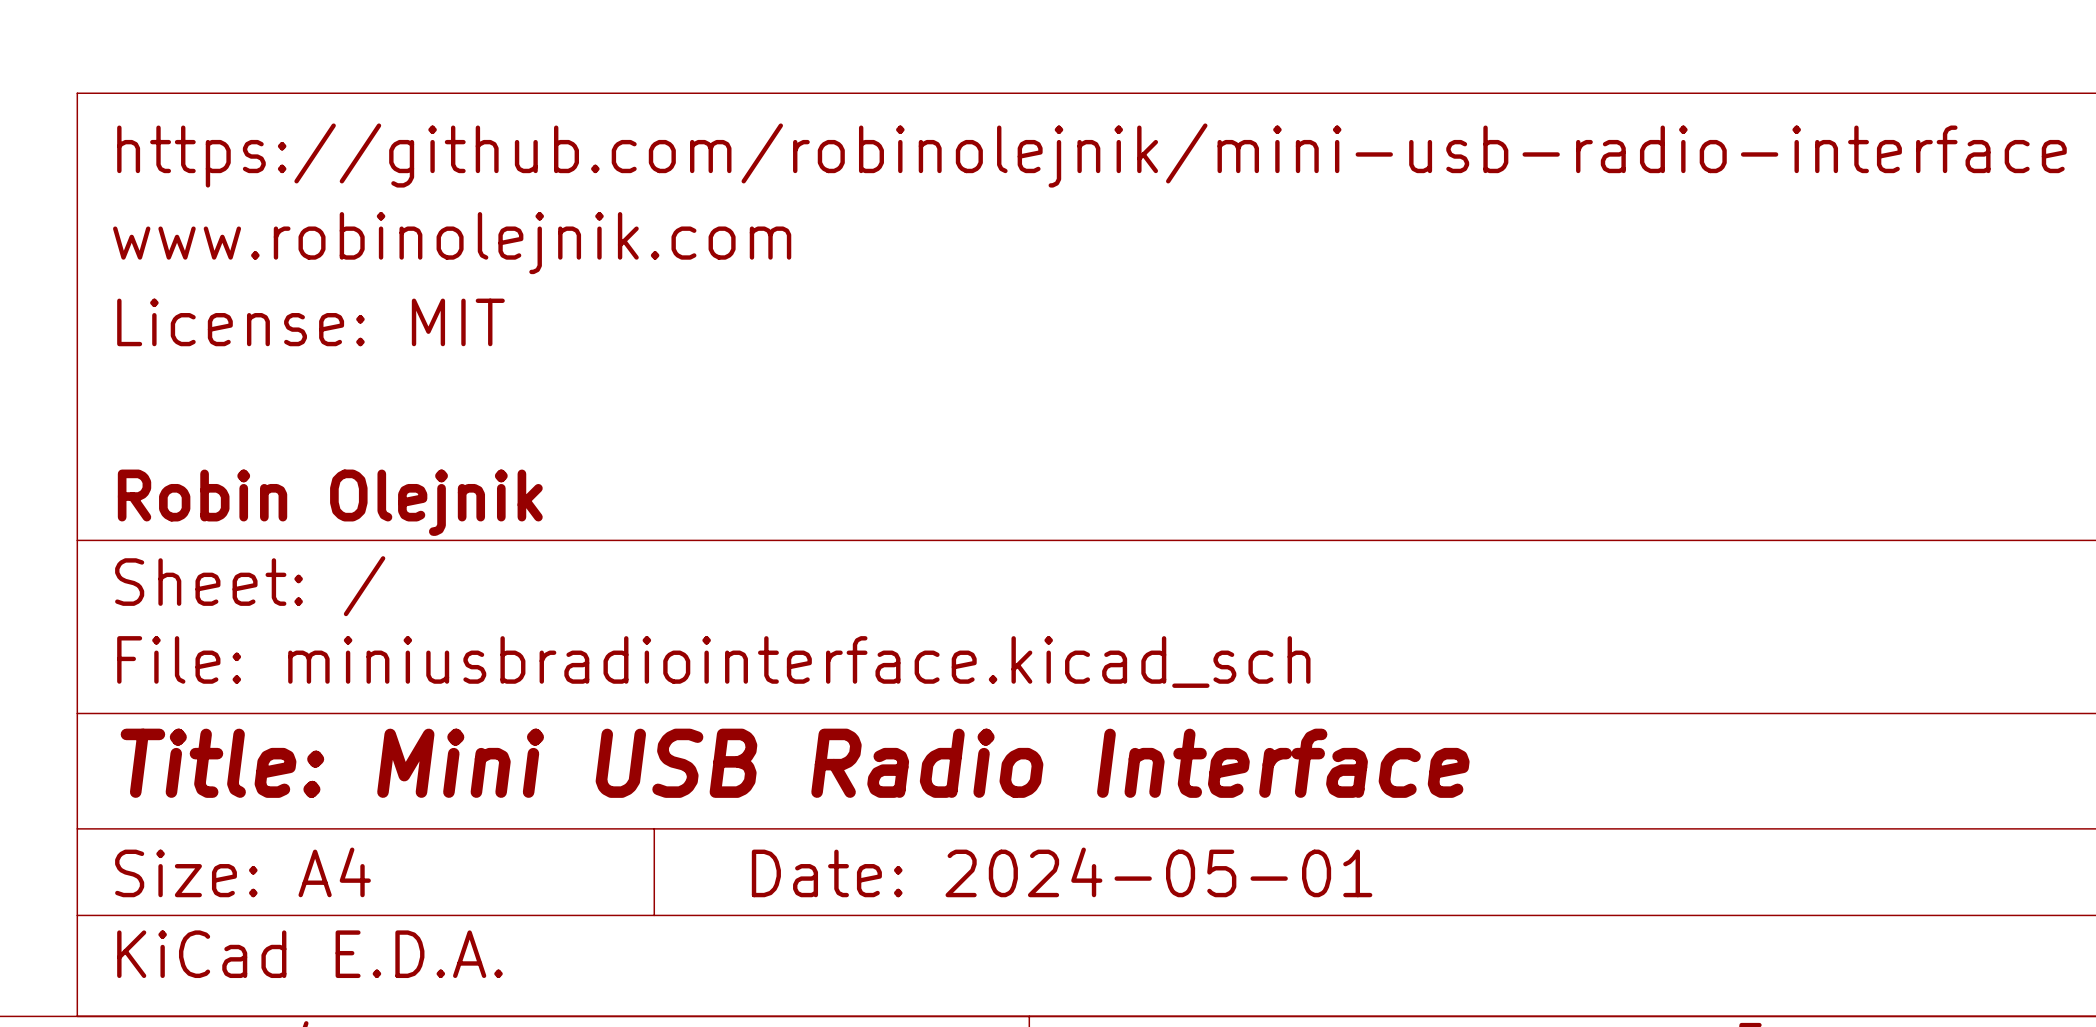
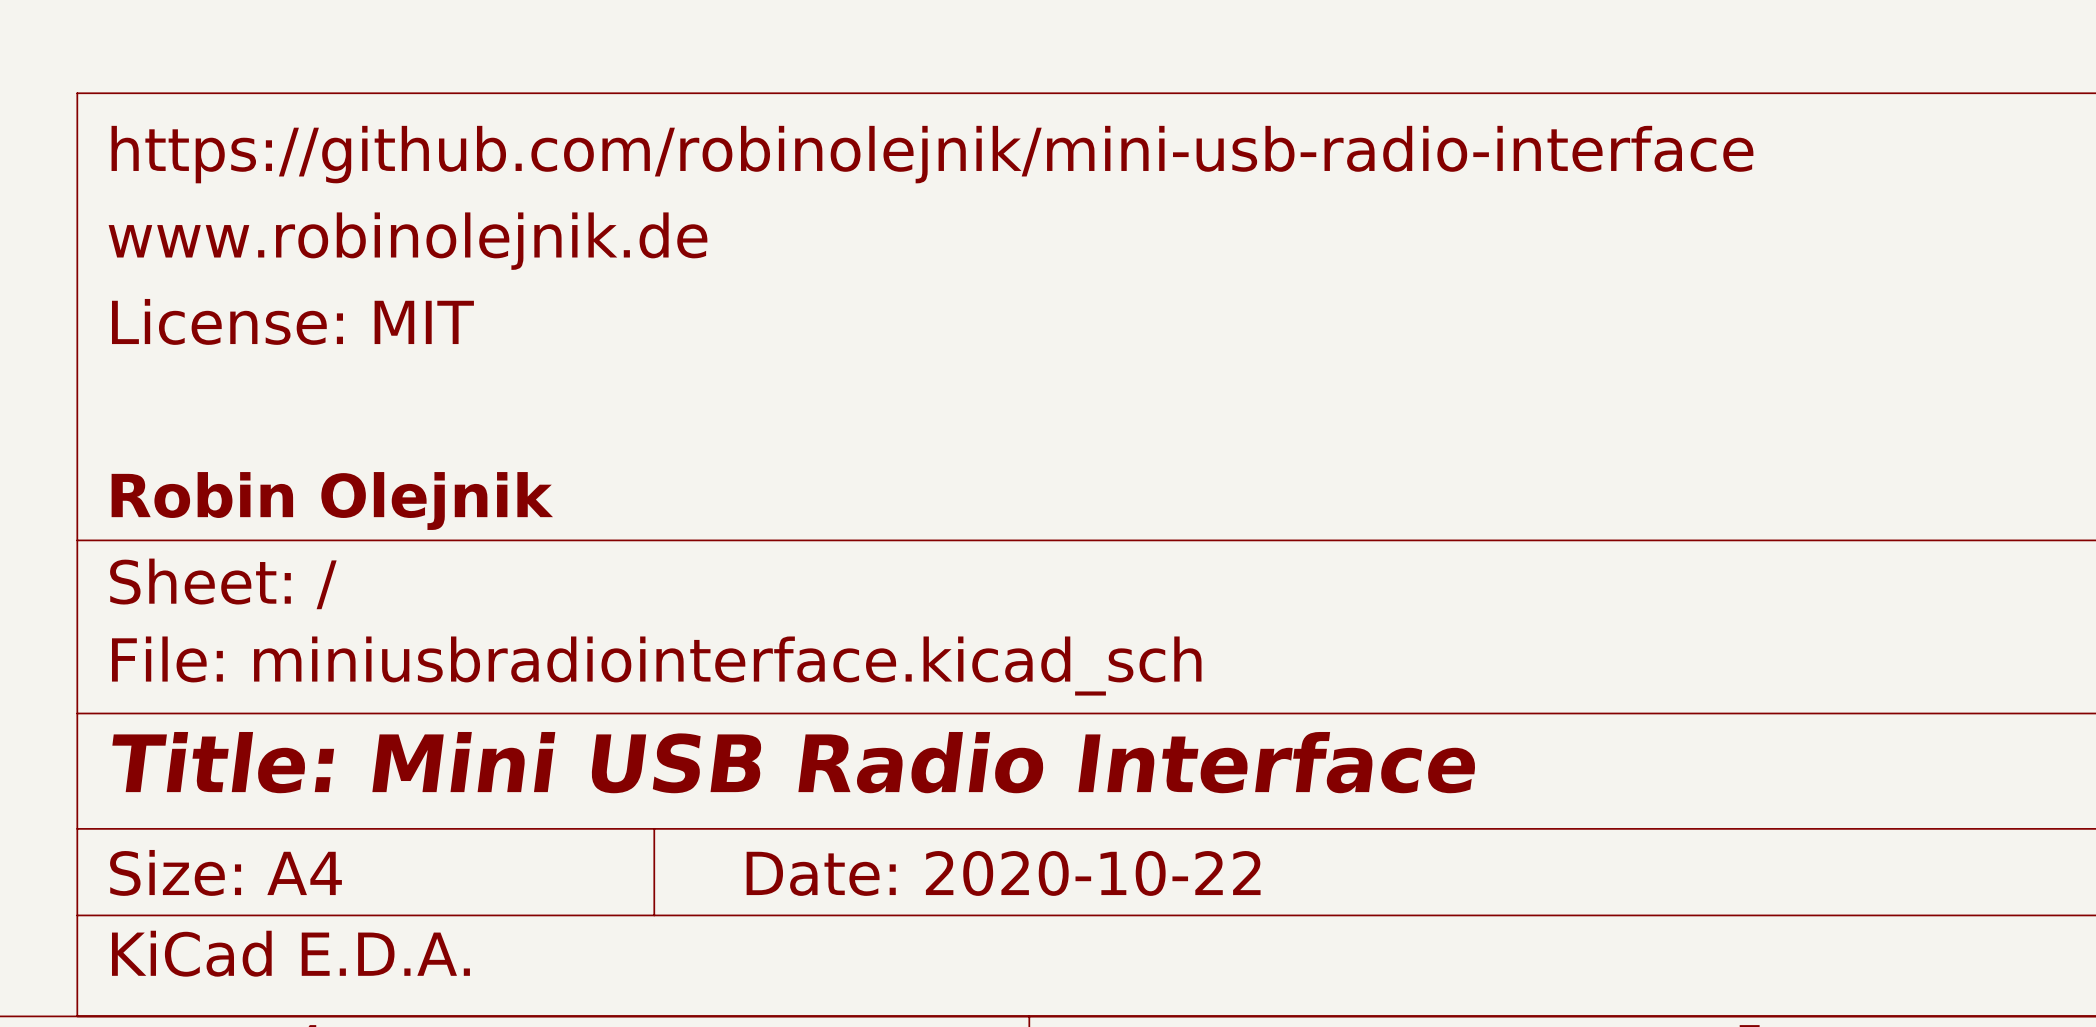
title block: www.robinolejnik.com (452, 243) -> www.robinolejnik.de (408, 241)
title block: Date: 2024-05-01 (1062, 872) -> Date: 2020-10-22 (1003, 873)

